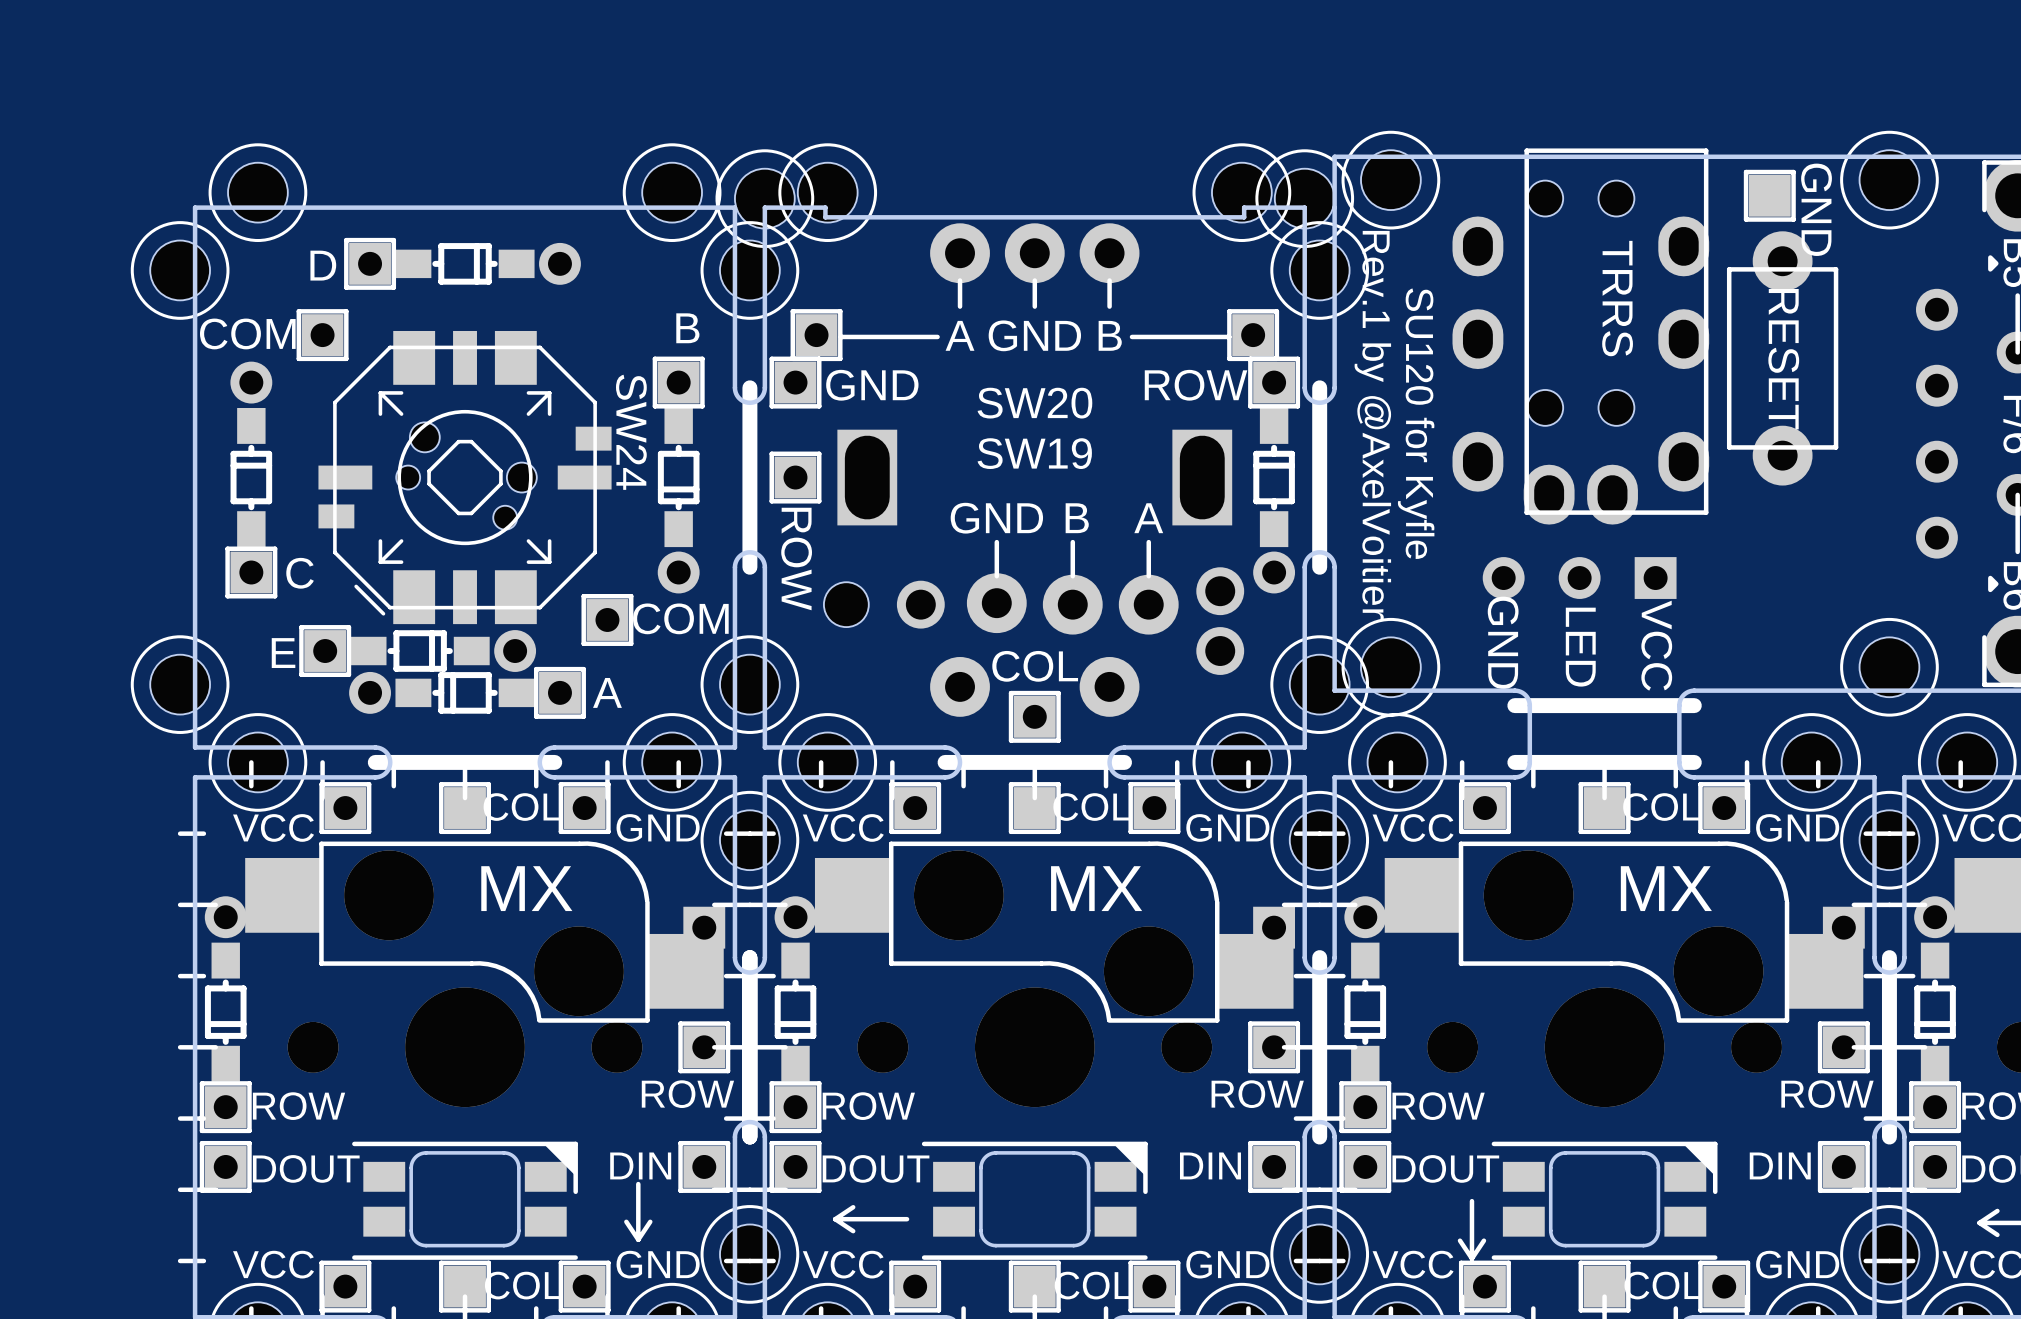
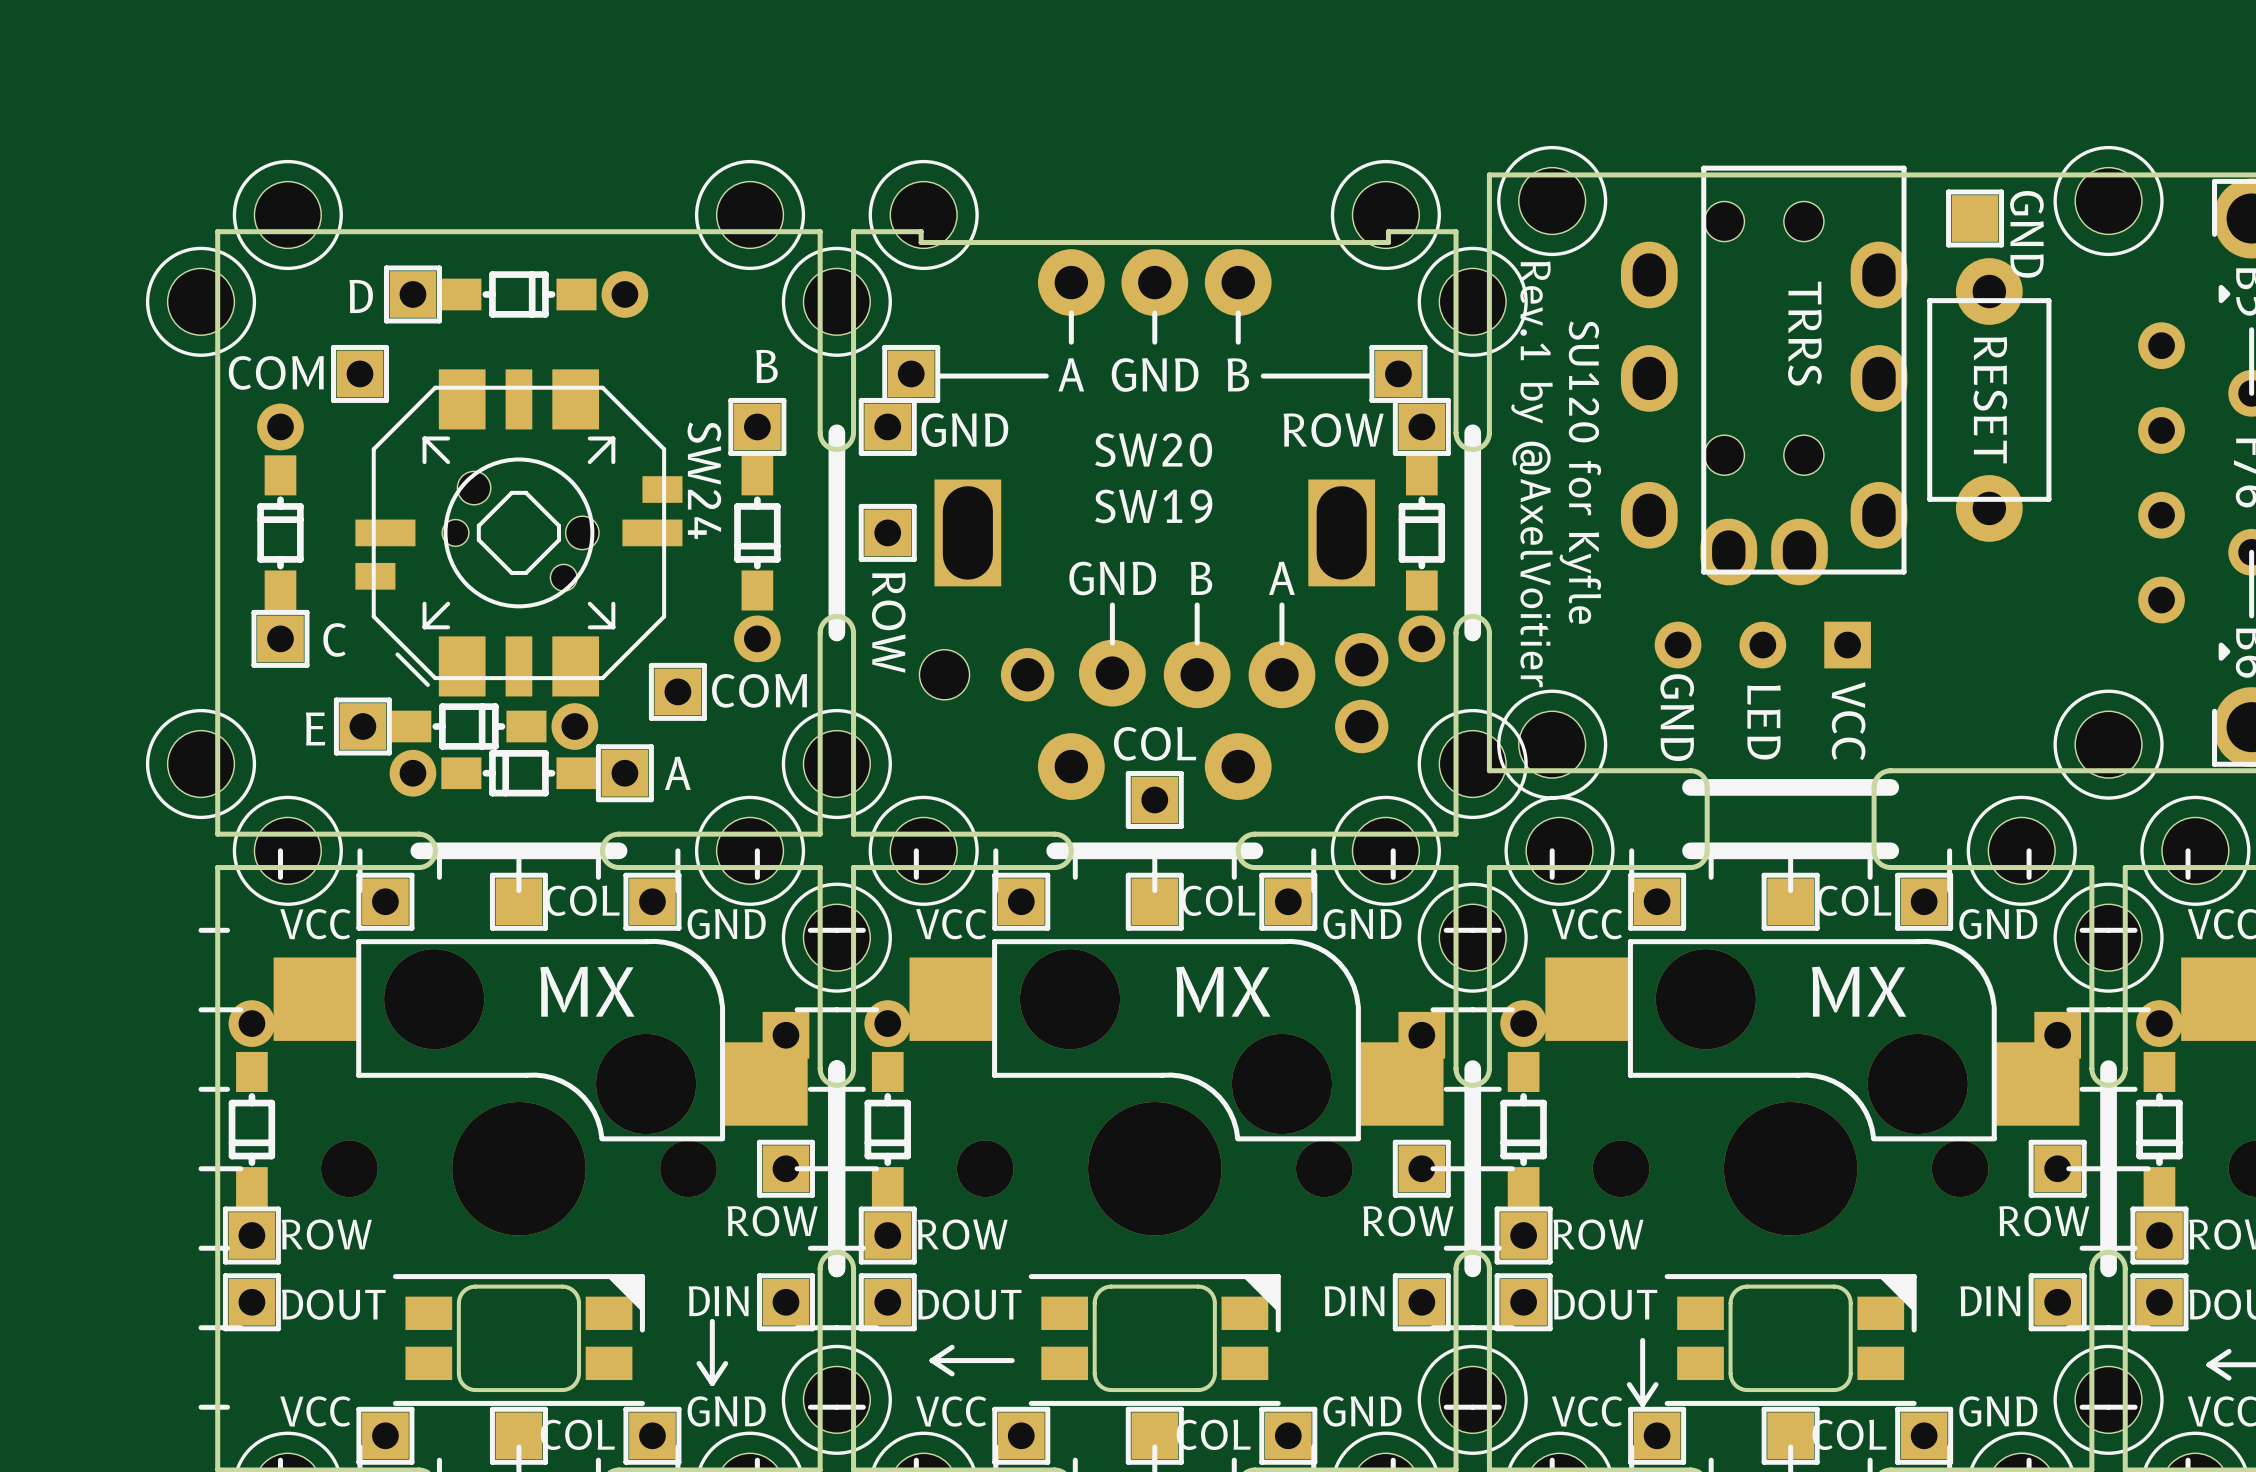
part: (764, 198) -> none
part: (1304, 198) -> none

